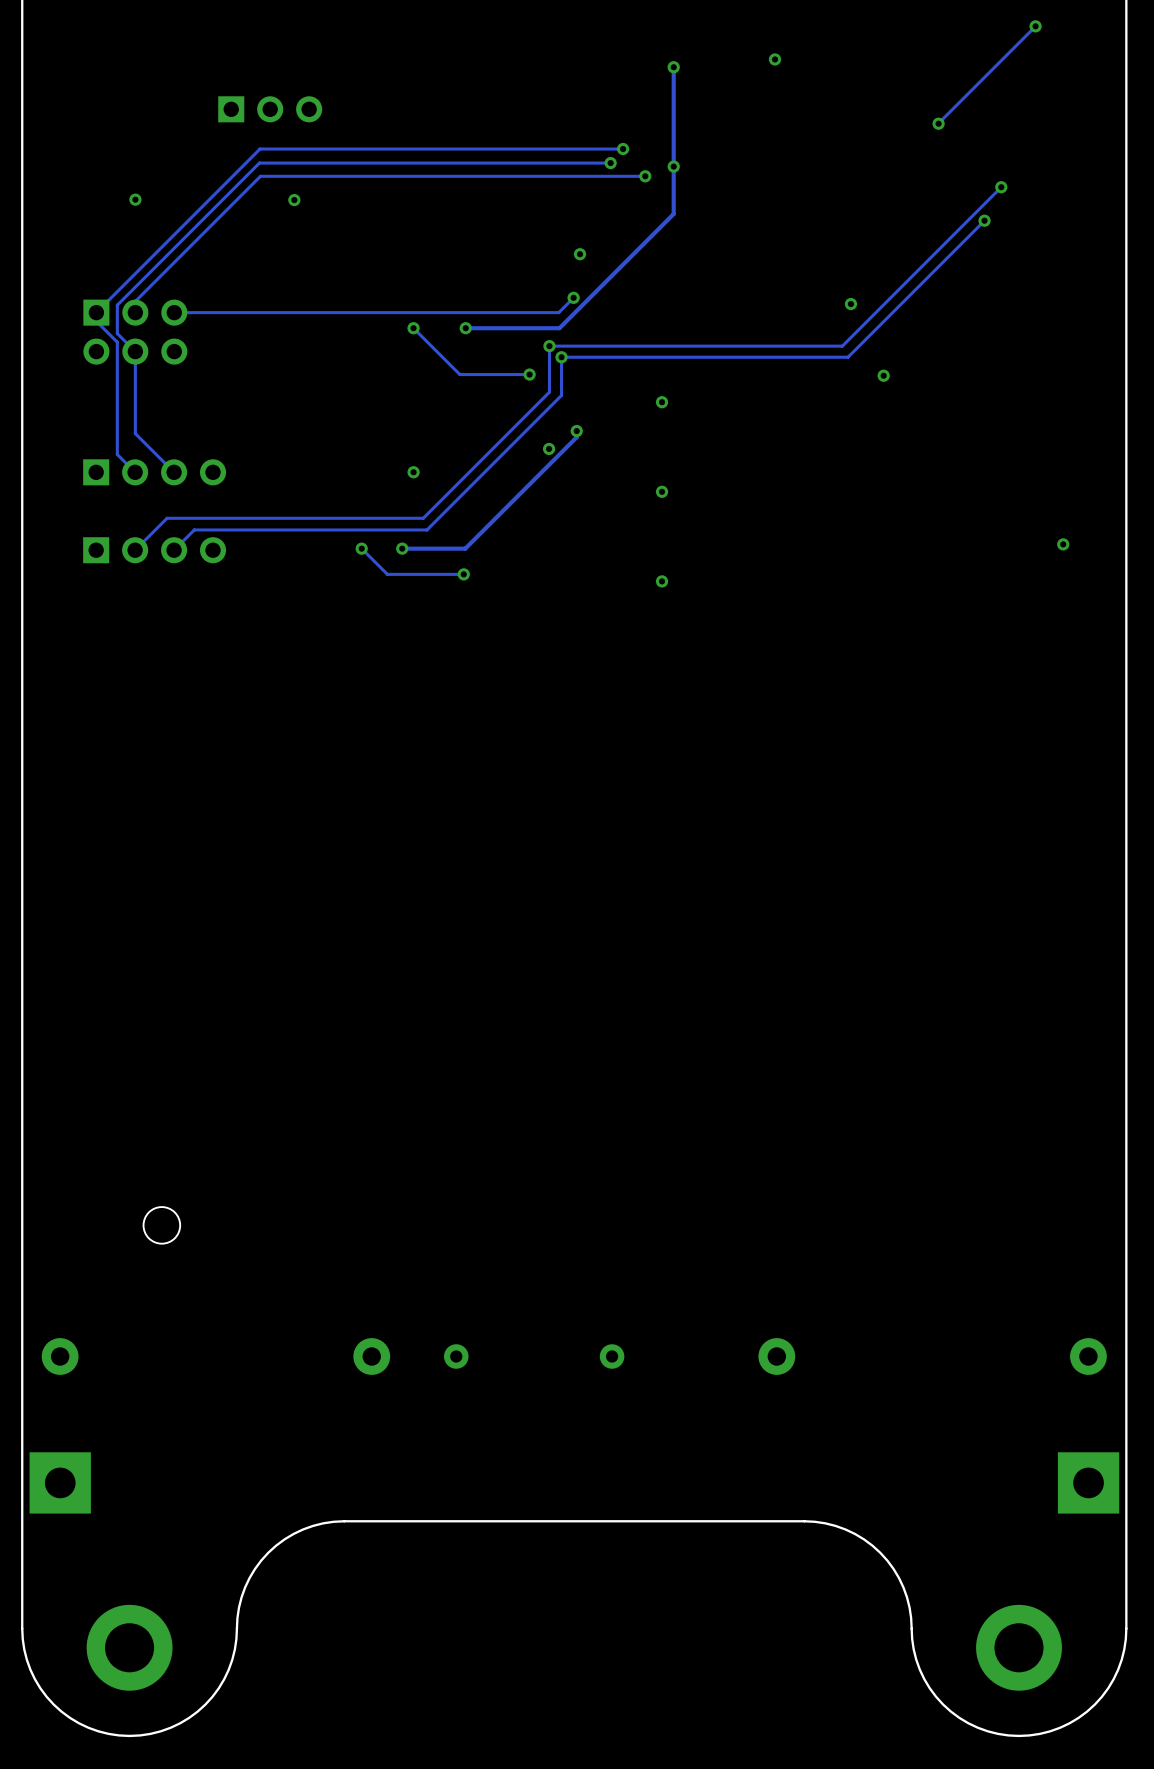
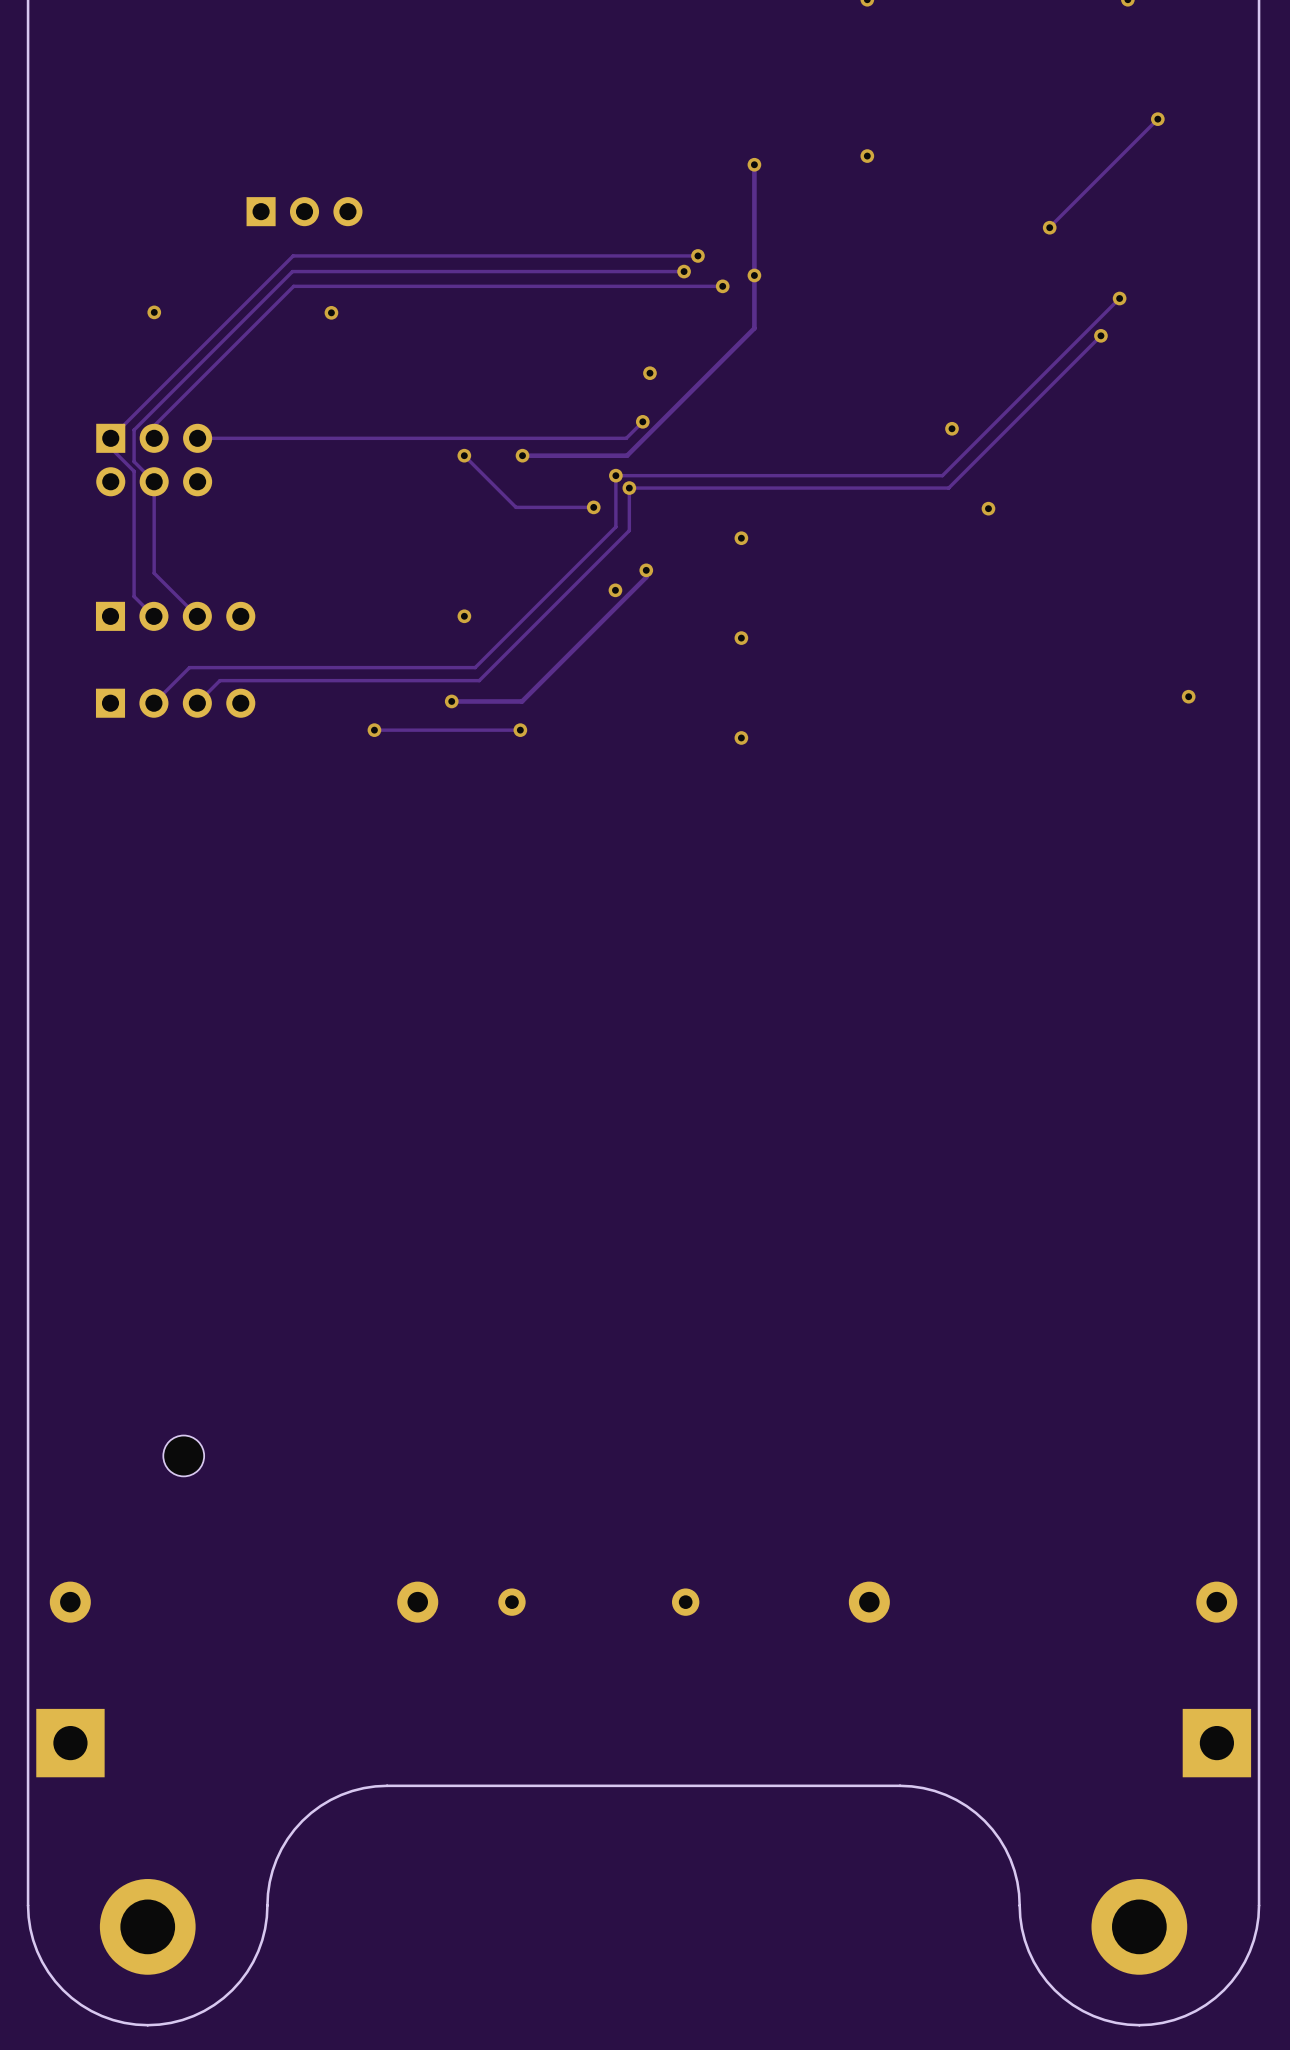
track: (361, 548) (387, 574) -> (374, 730) (435, 730)
via position: (361, 548) -> (374, 730)

